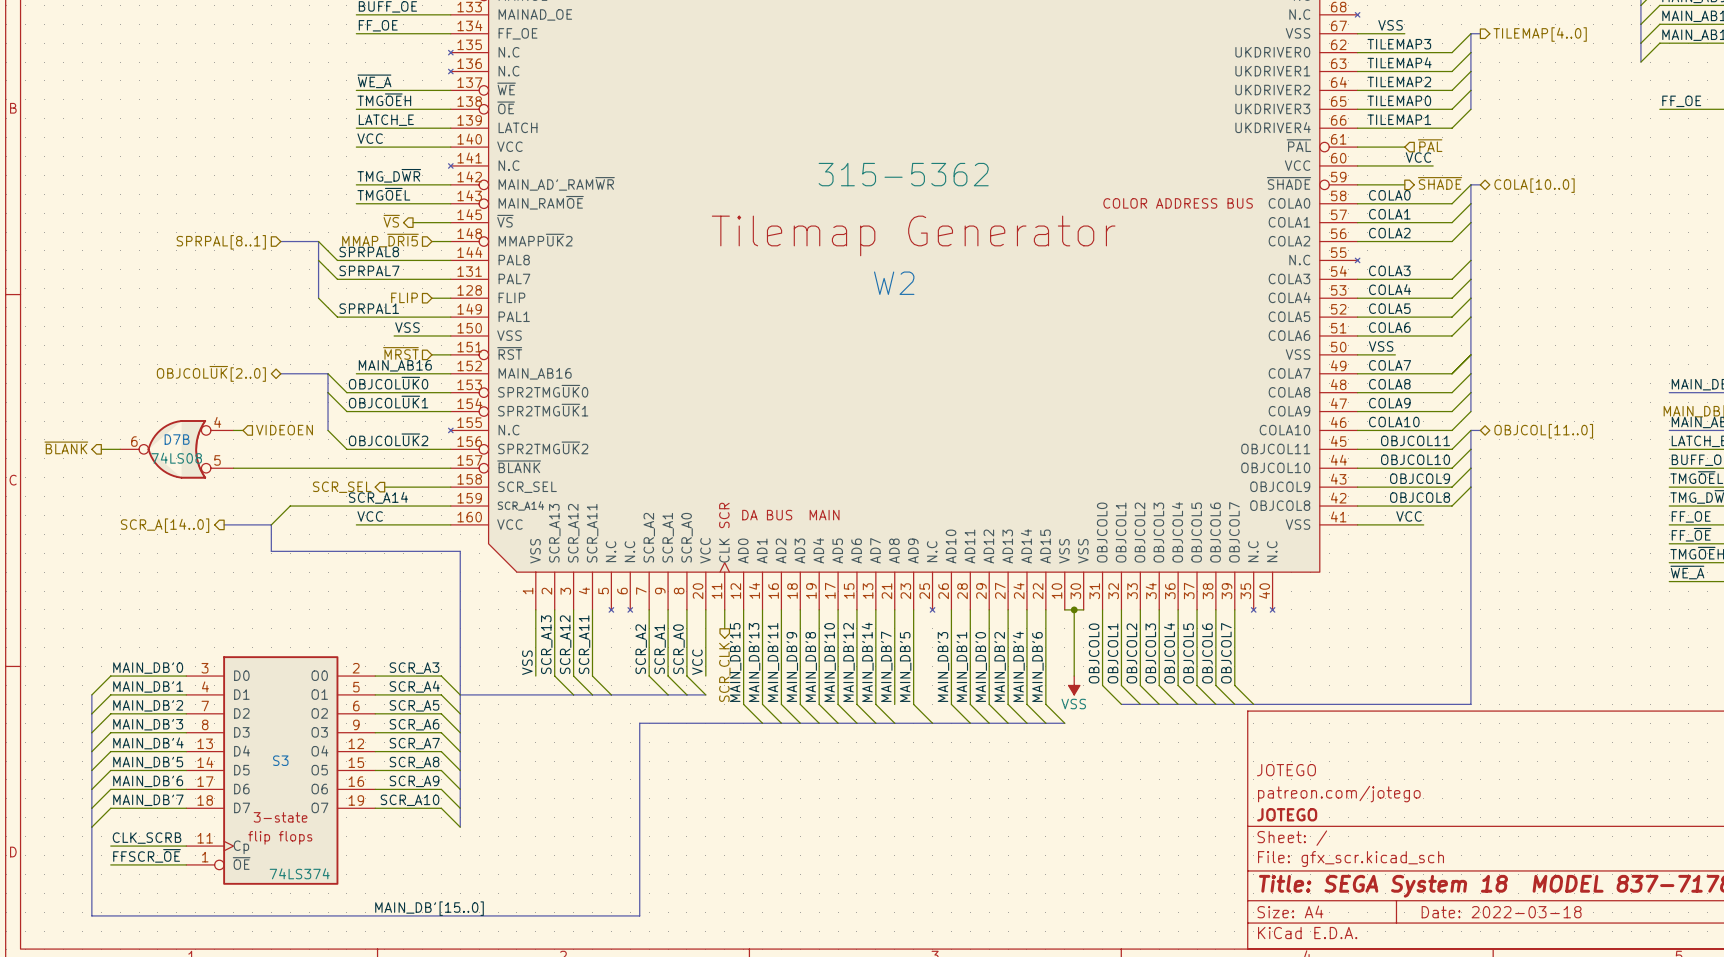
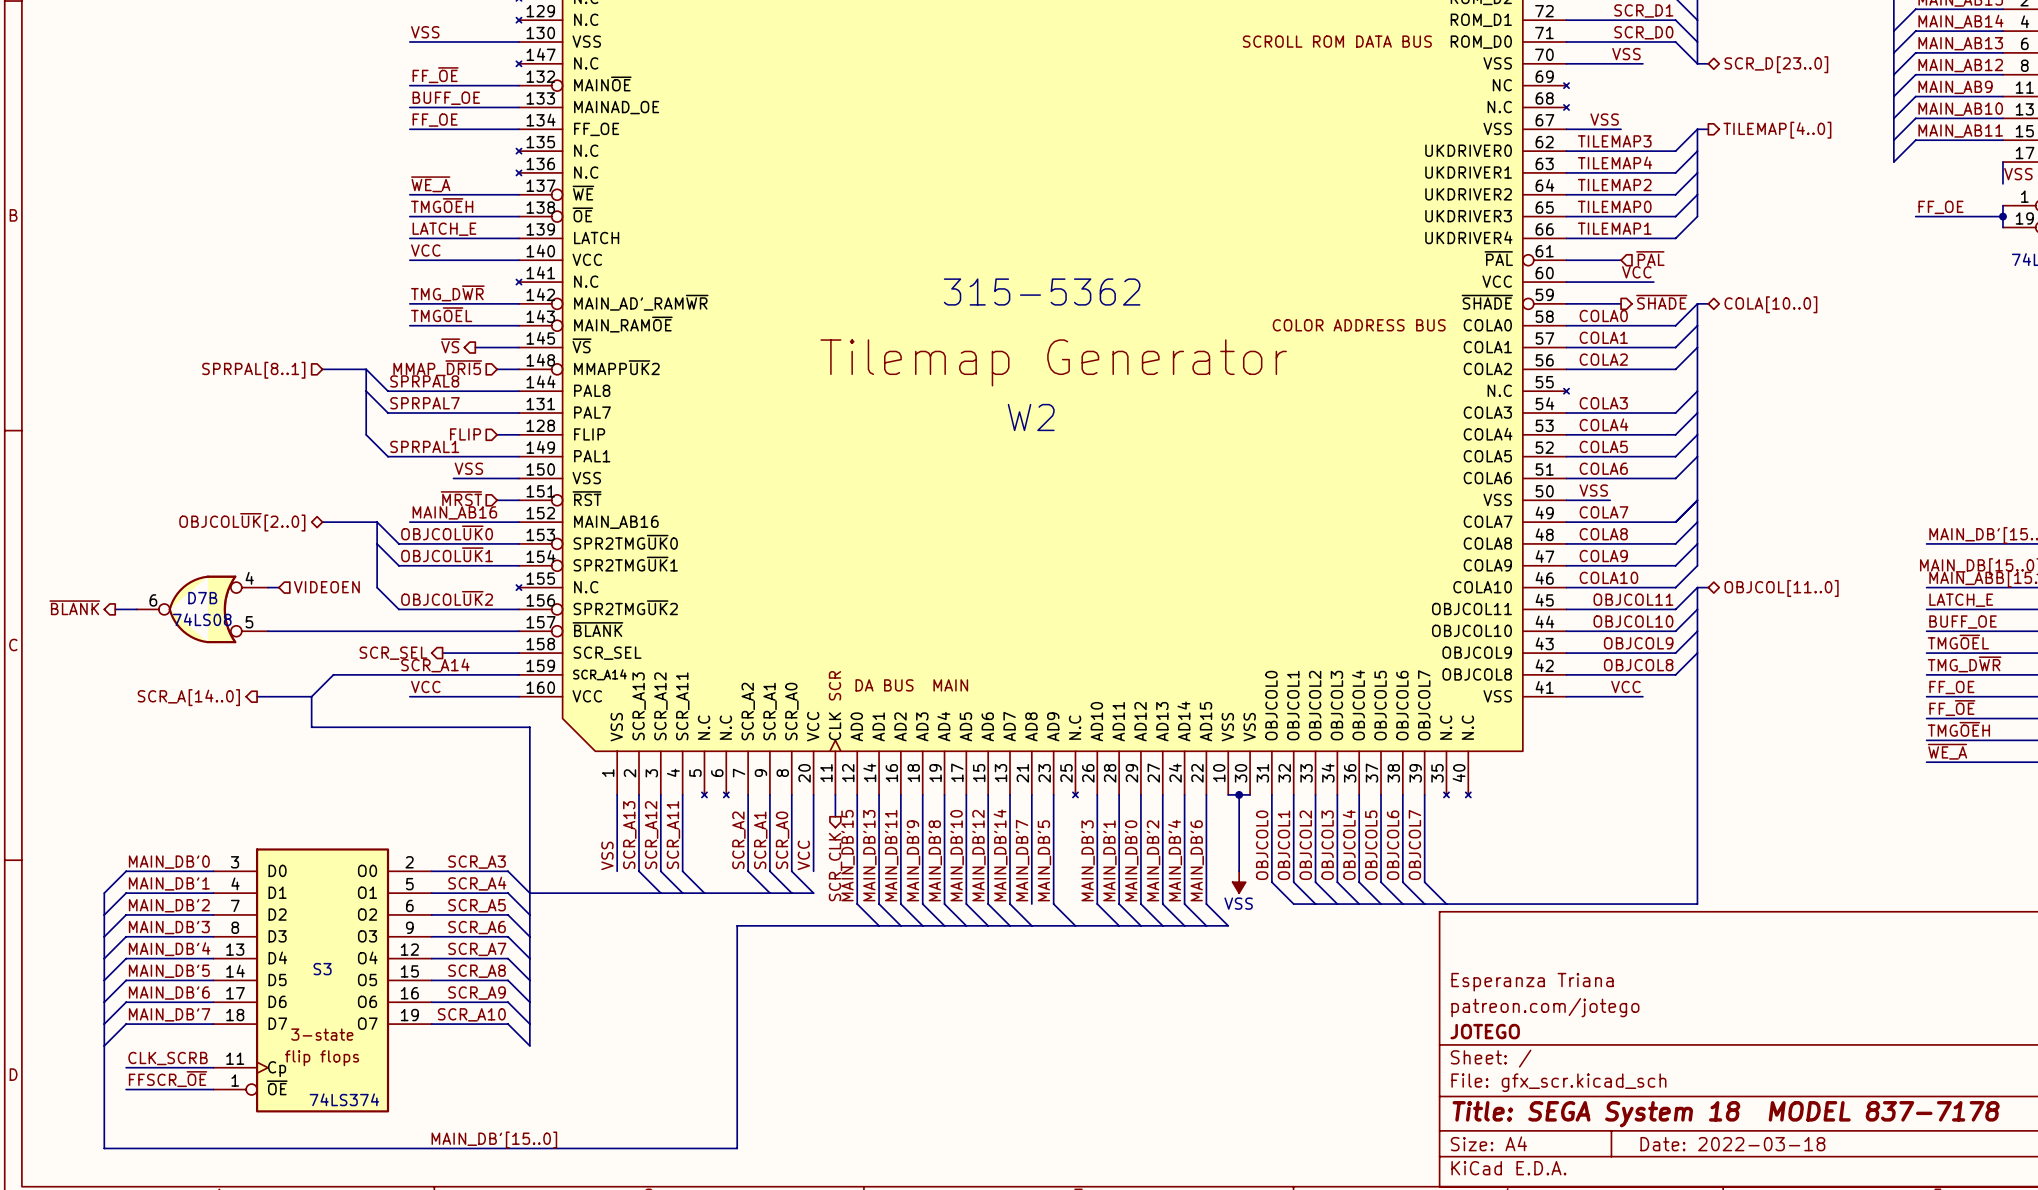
title block: JOTEGO (1286, 770) -> Esperanza Triana (1532, 982)

